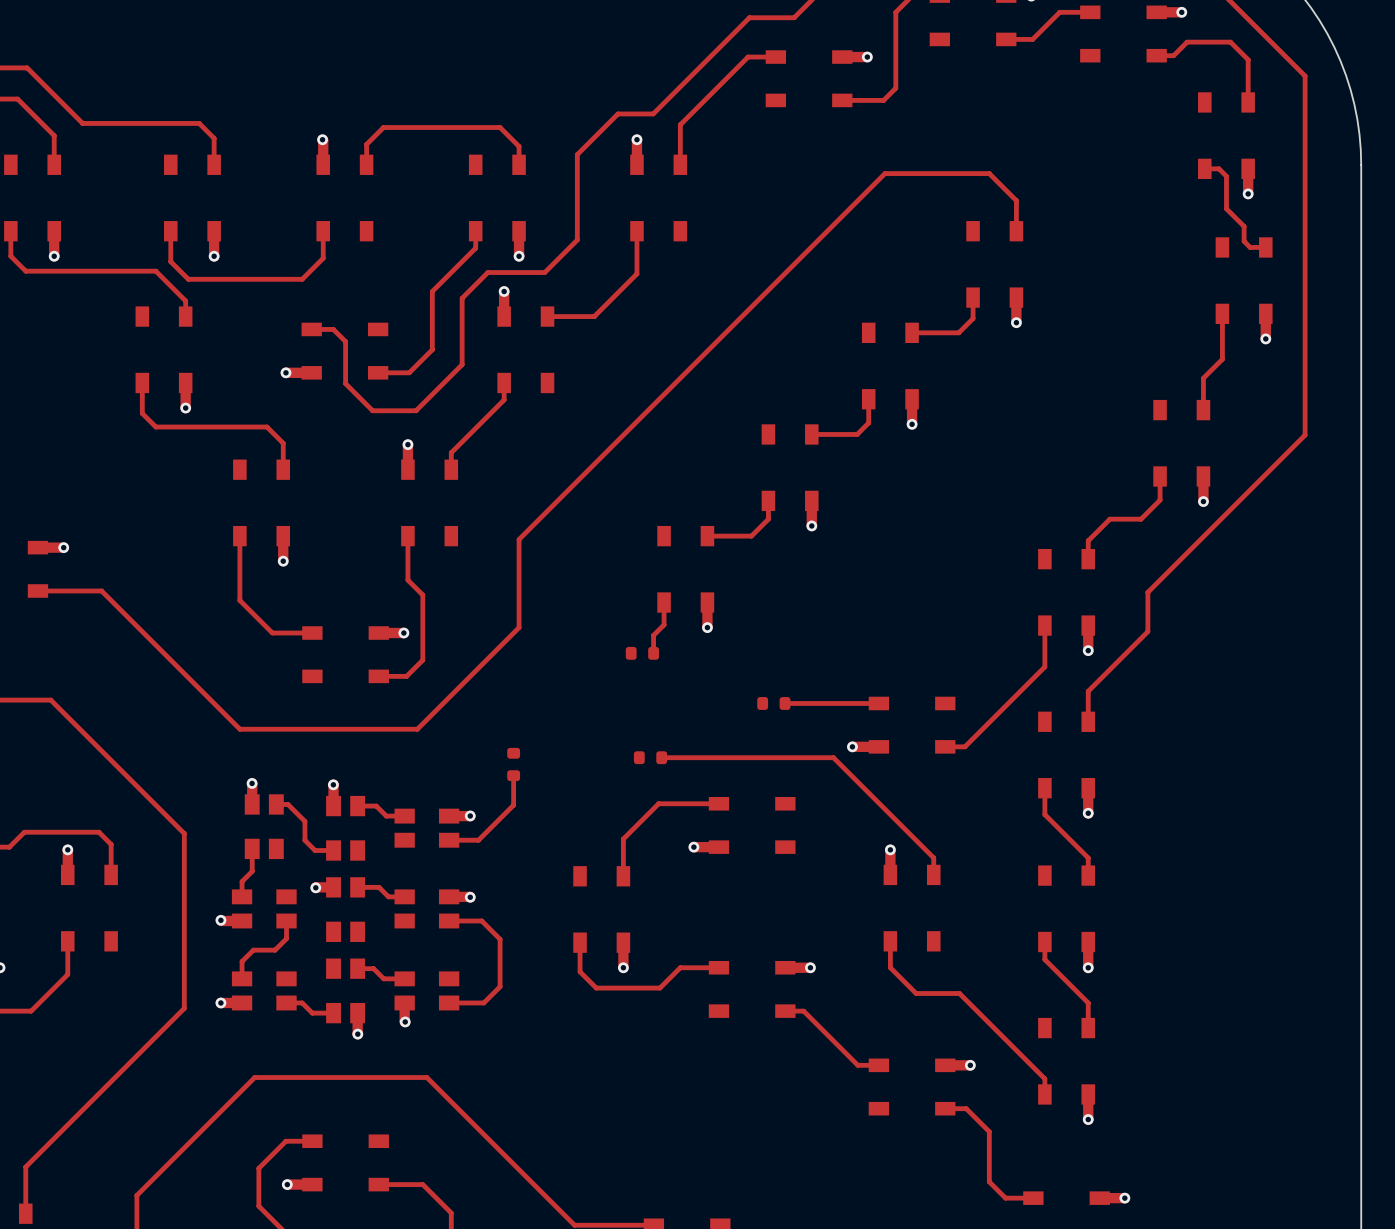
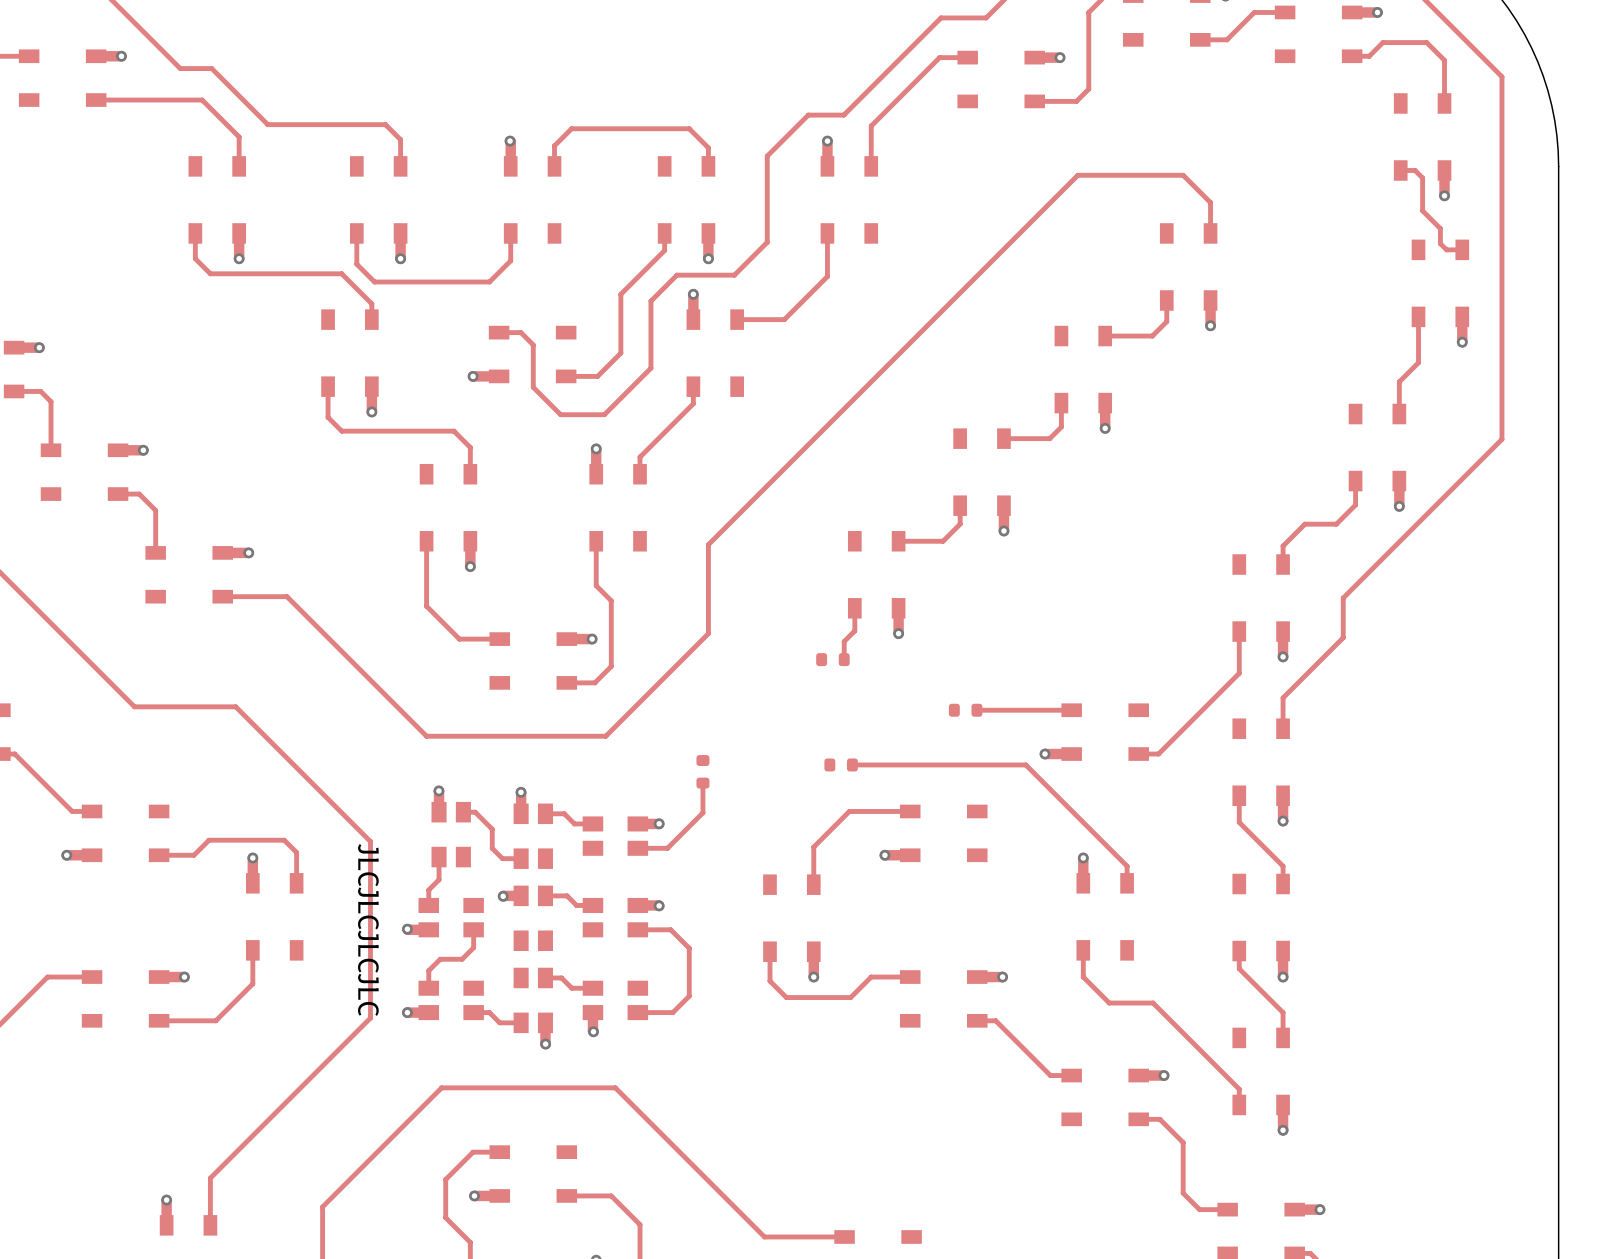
text: none -> JLCJLCJLCJLC (368, 930)

